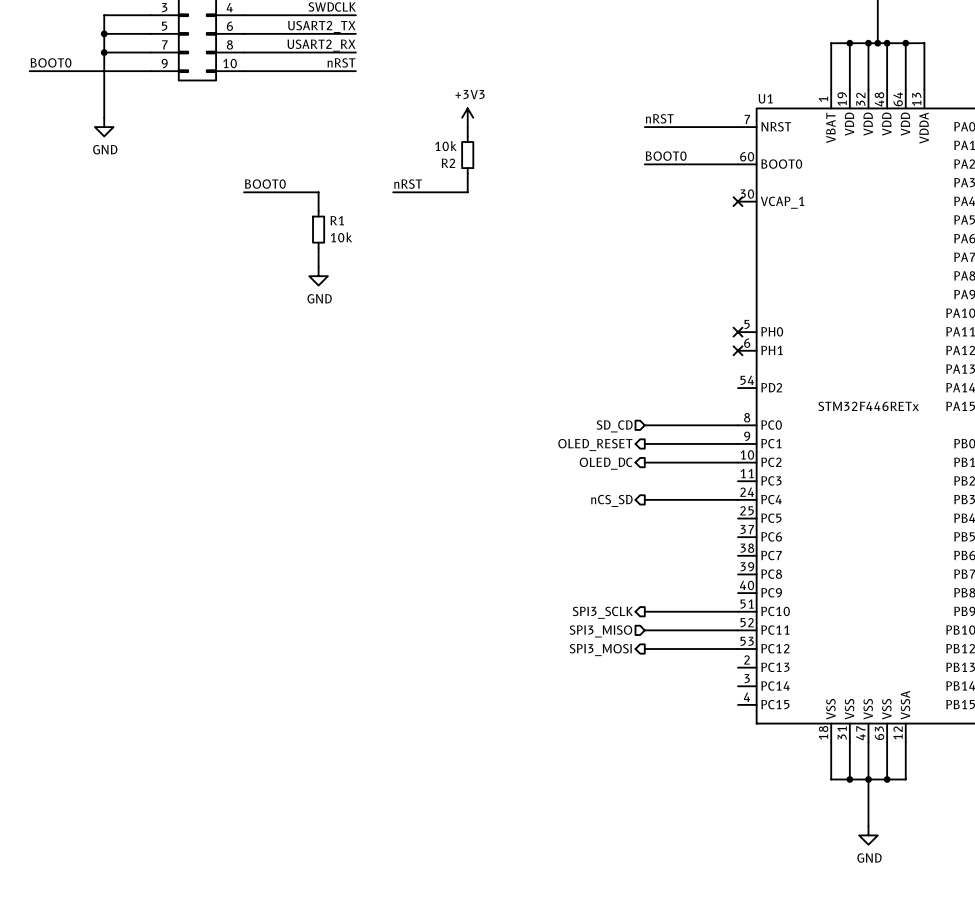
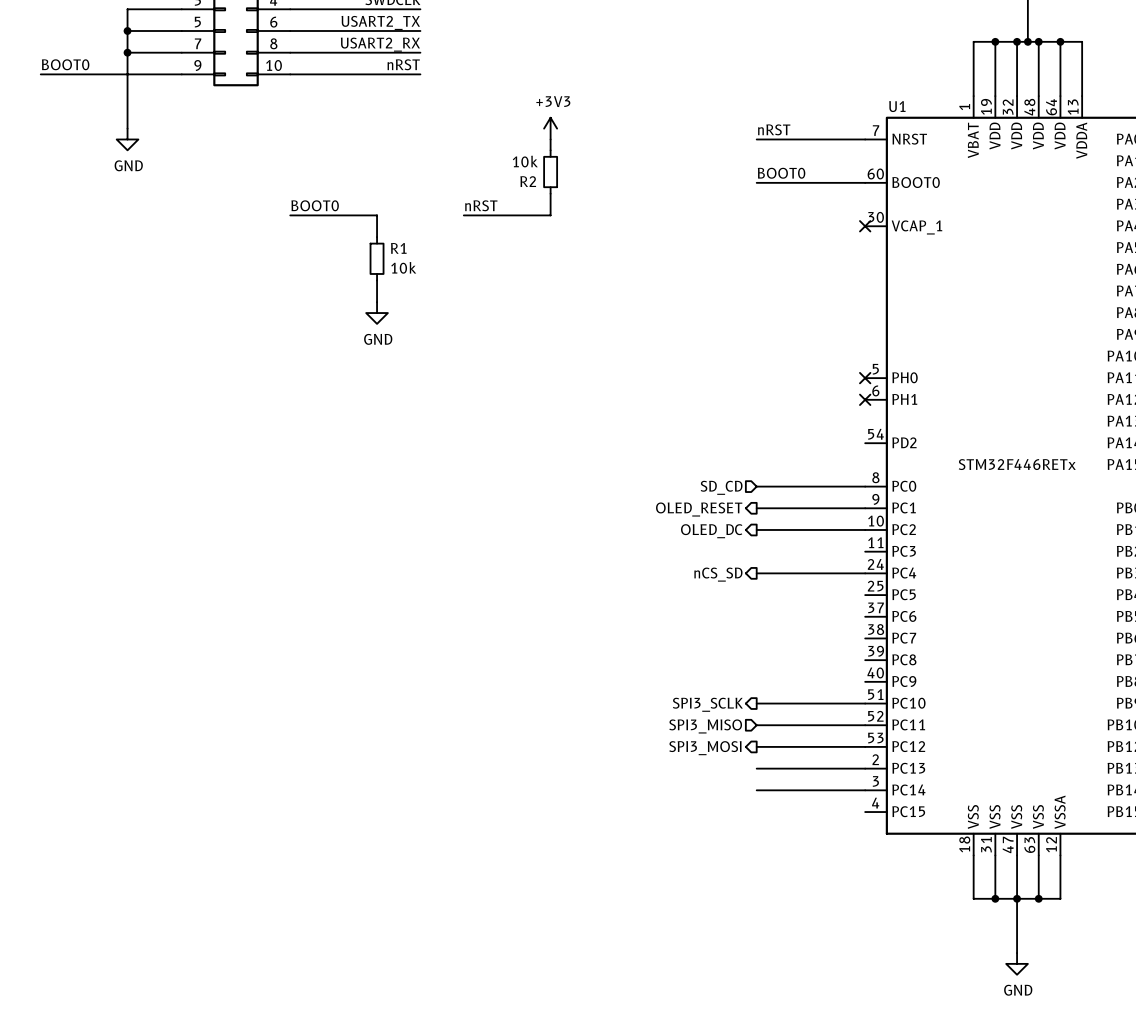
wire: none -> (756, 768) (865, 768)
wire: none -> (756, 790) (865, 790)

